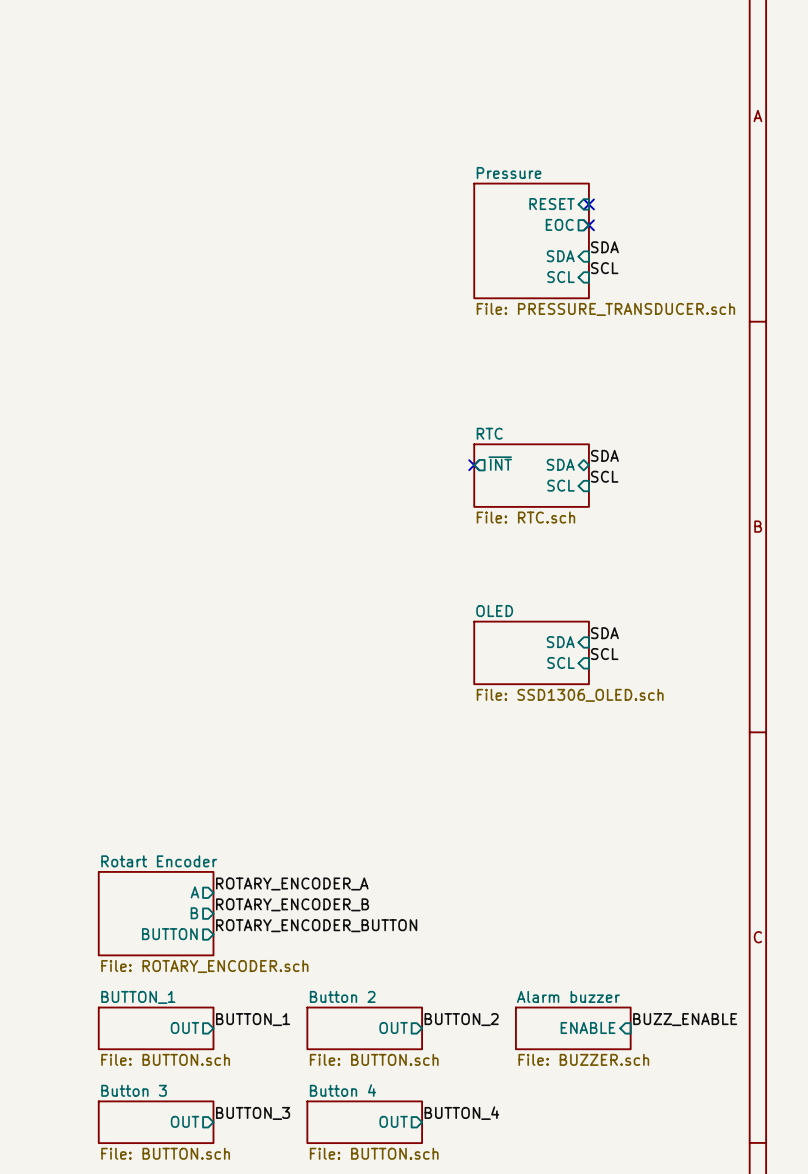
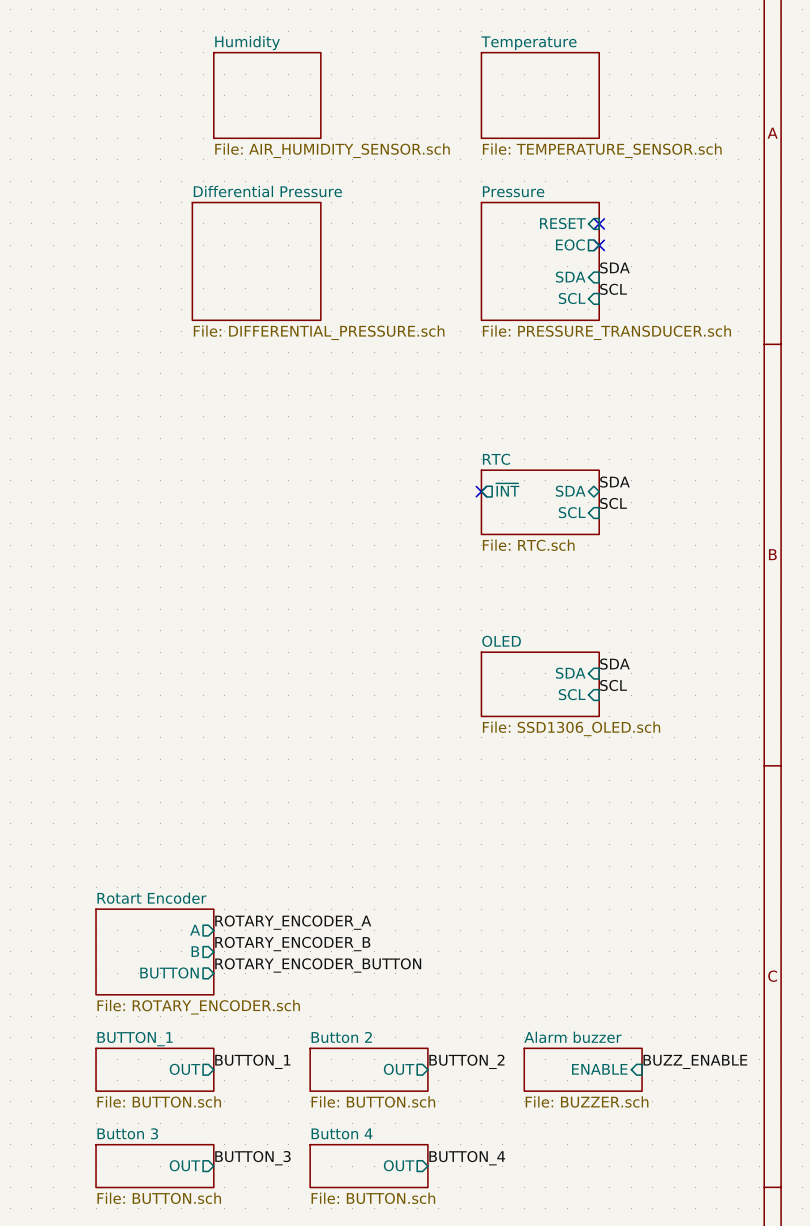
sheet Humidity: none -> File: AIR_HUMIDITY_SENSOR.sch (267, 95)
sheet Temperature: none -> File: TEMPERATURE_SENSOR.sch (540, 95)
sheet Differential Pressure: none -> File: DIFFERENTIAL_PRESSURE.sch (256, 261)

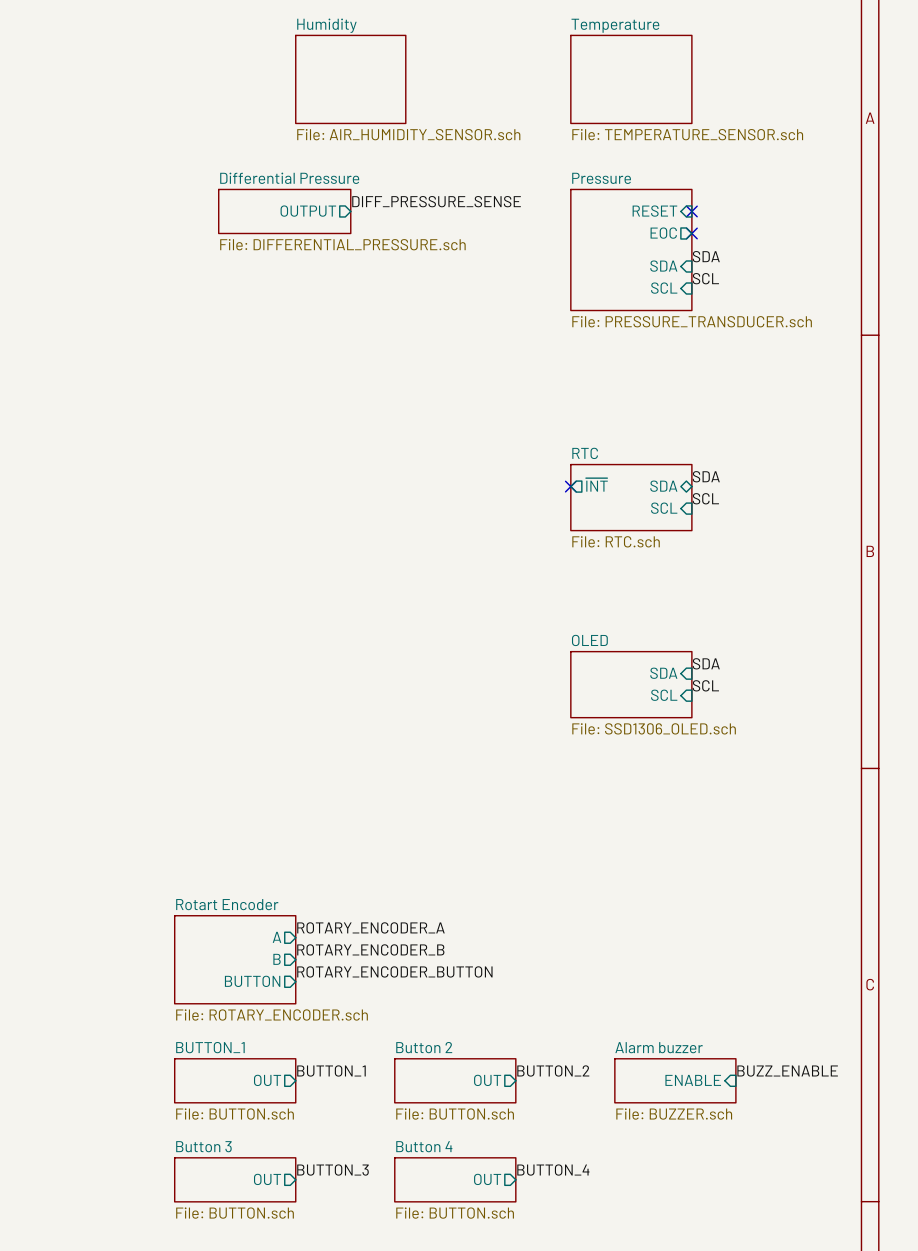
label: none -> DIFF_PRESSURE_SENSE (436, 201)
sheet Differential Pressure: none -> File: DIFFERENTIAL_PRESSURE.sch (284, 211)
sheet pin: none -> OUTPUT (308, 211)
sheet Differential Pressure: File: DIFFERENTIAL_PRESSURE.sch (256, 261) -> none

